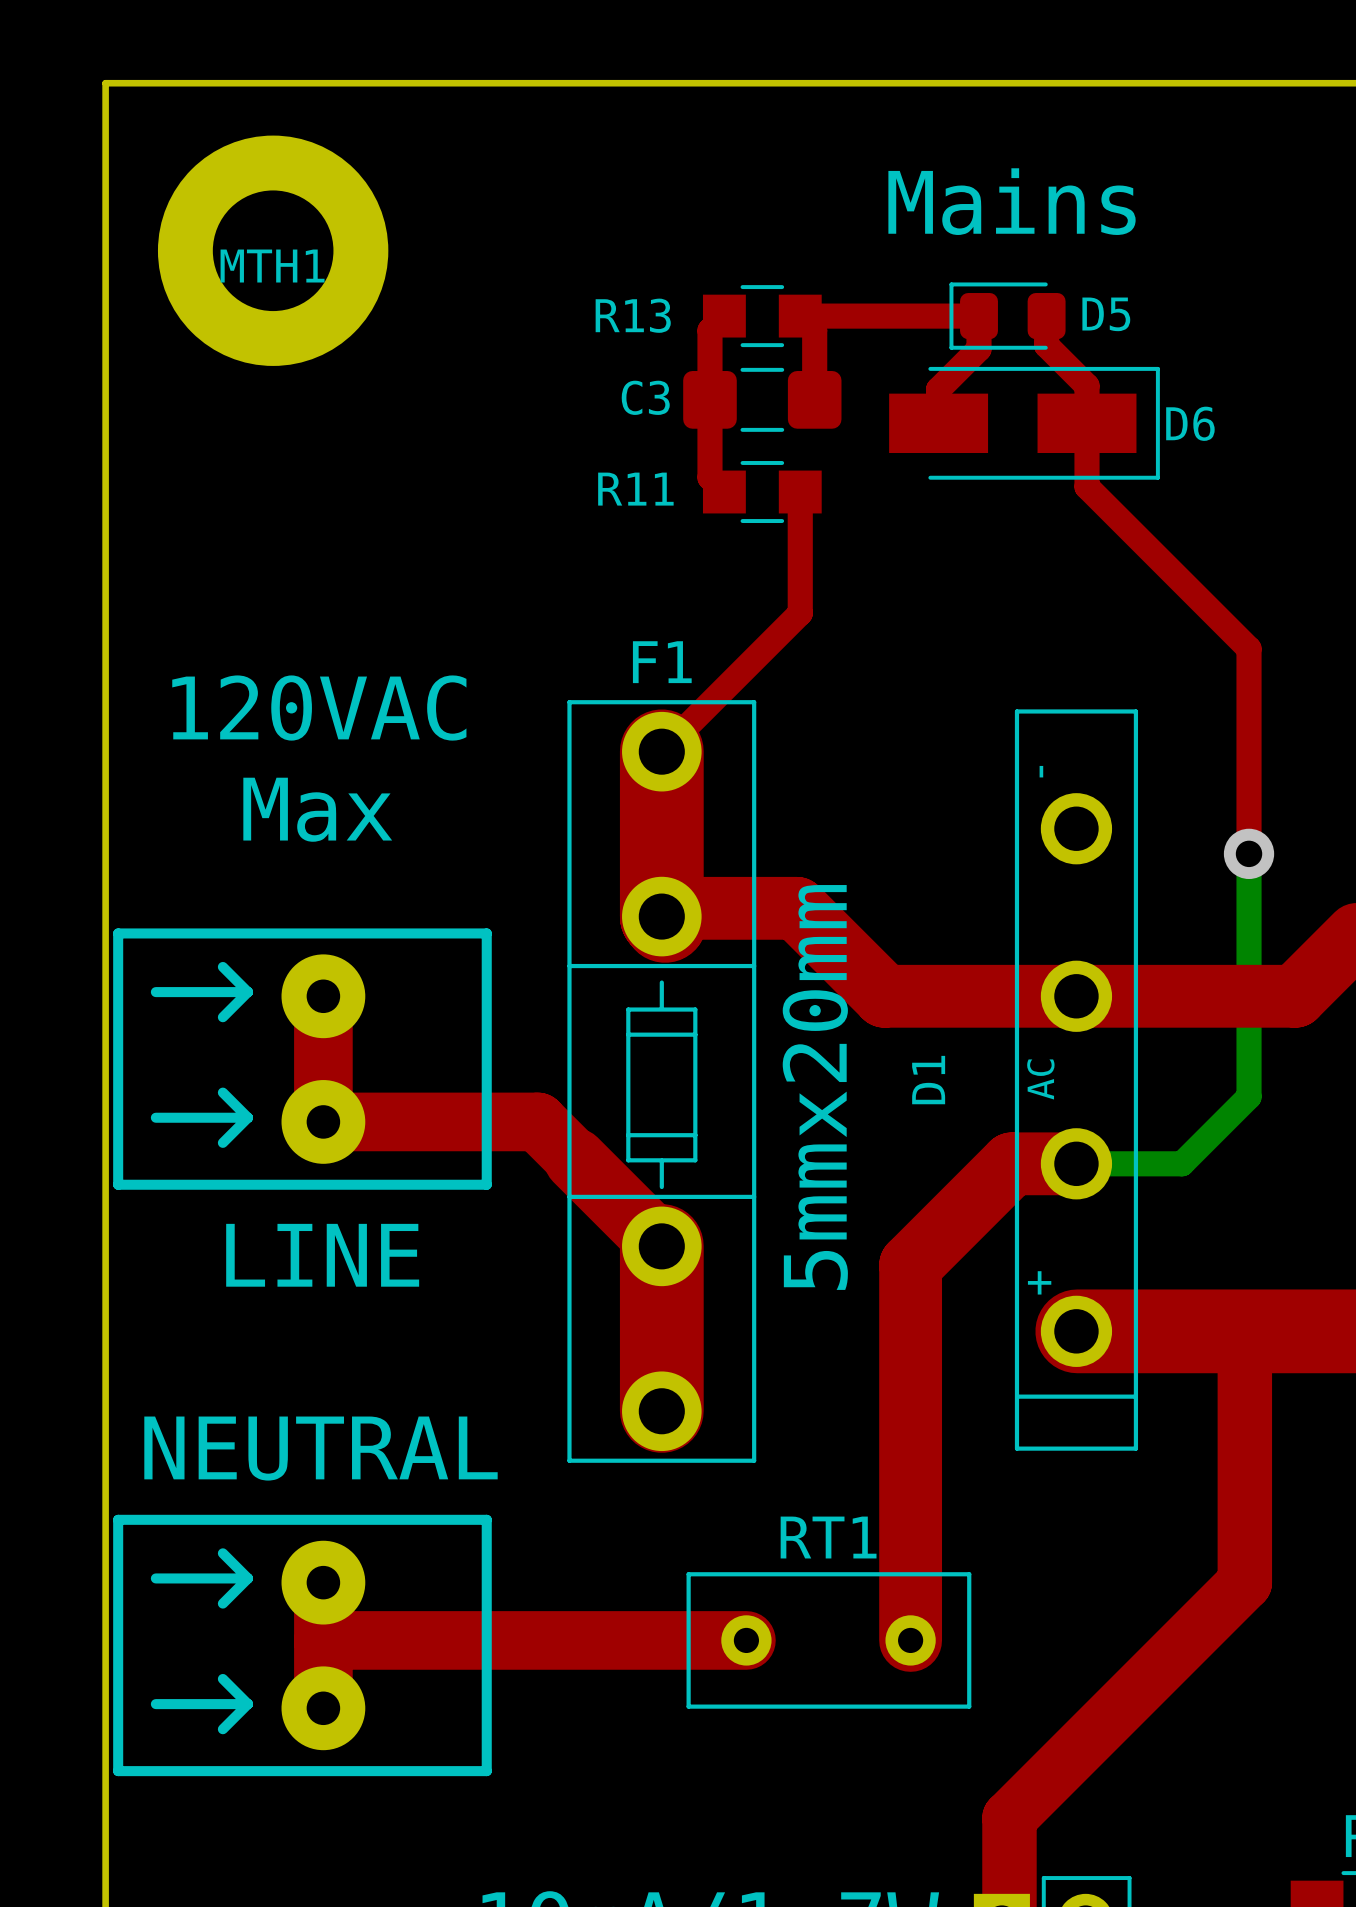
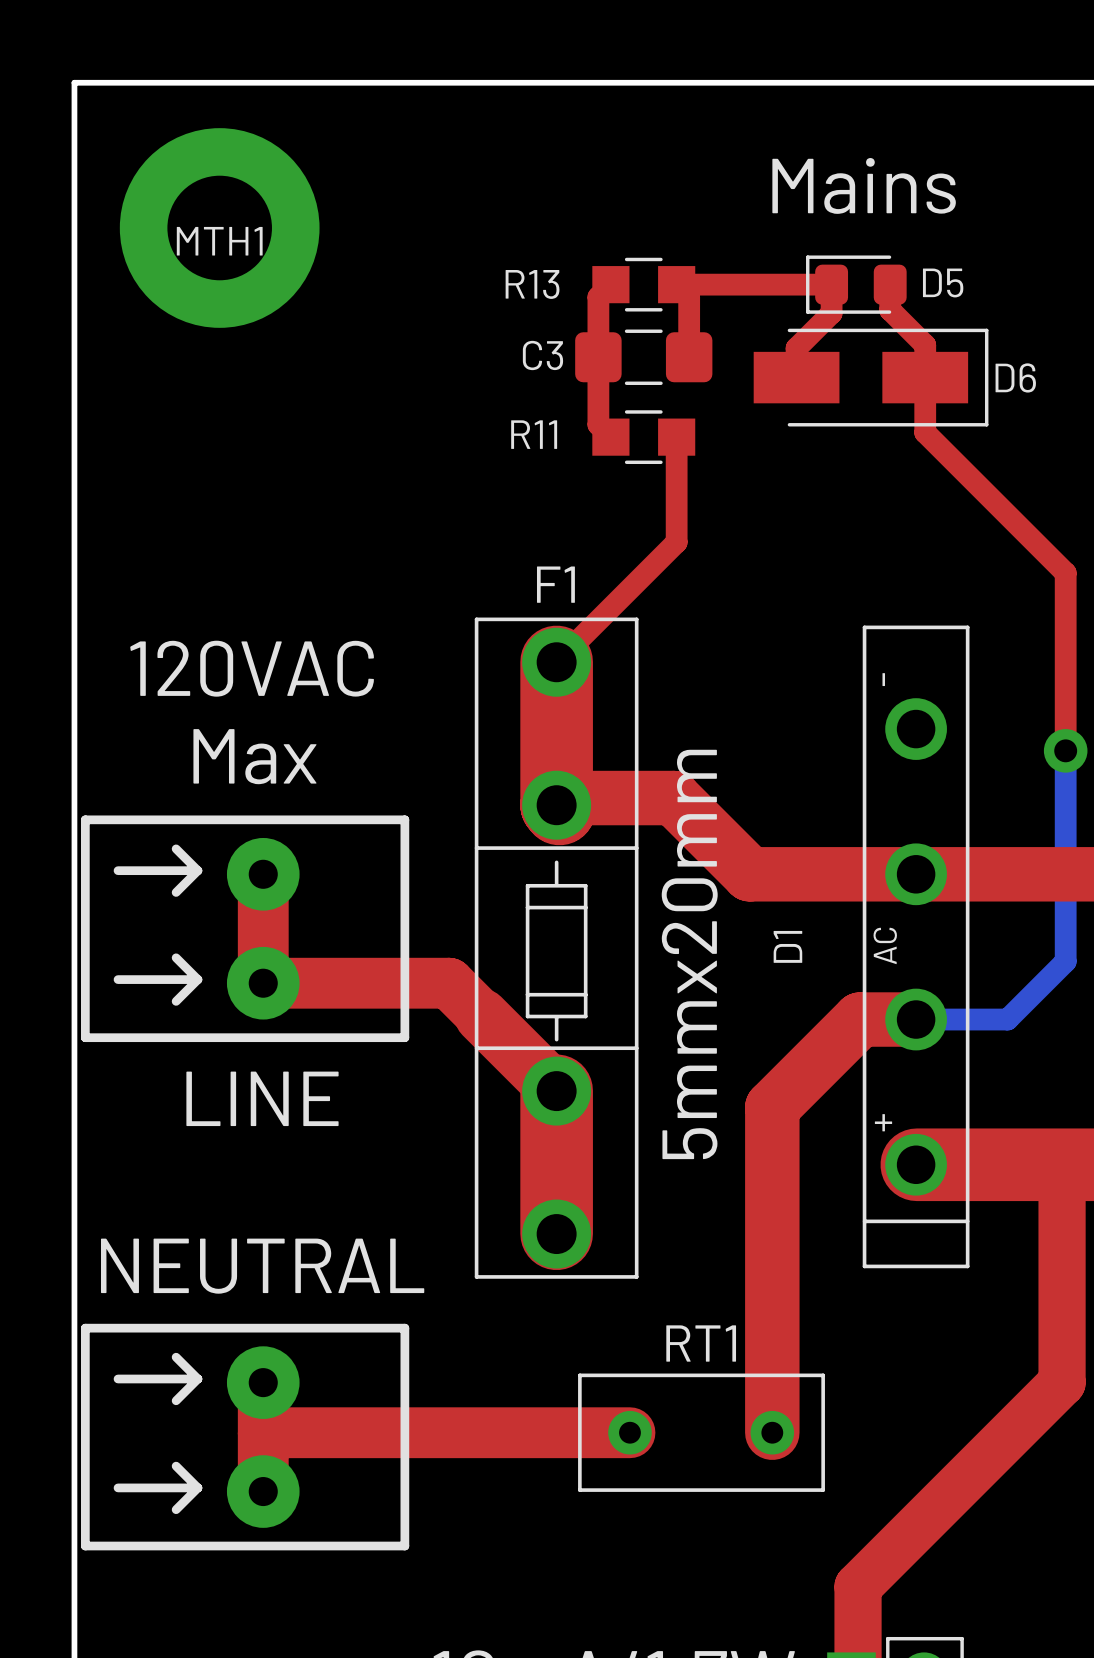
text position: 120VAC (319, 708) -> 120VAC (252, 668)
text position: Max (317, 809) -> Max (255, 756)

